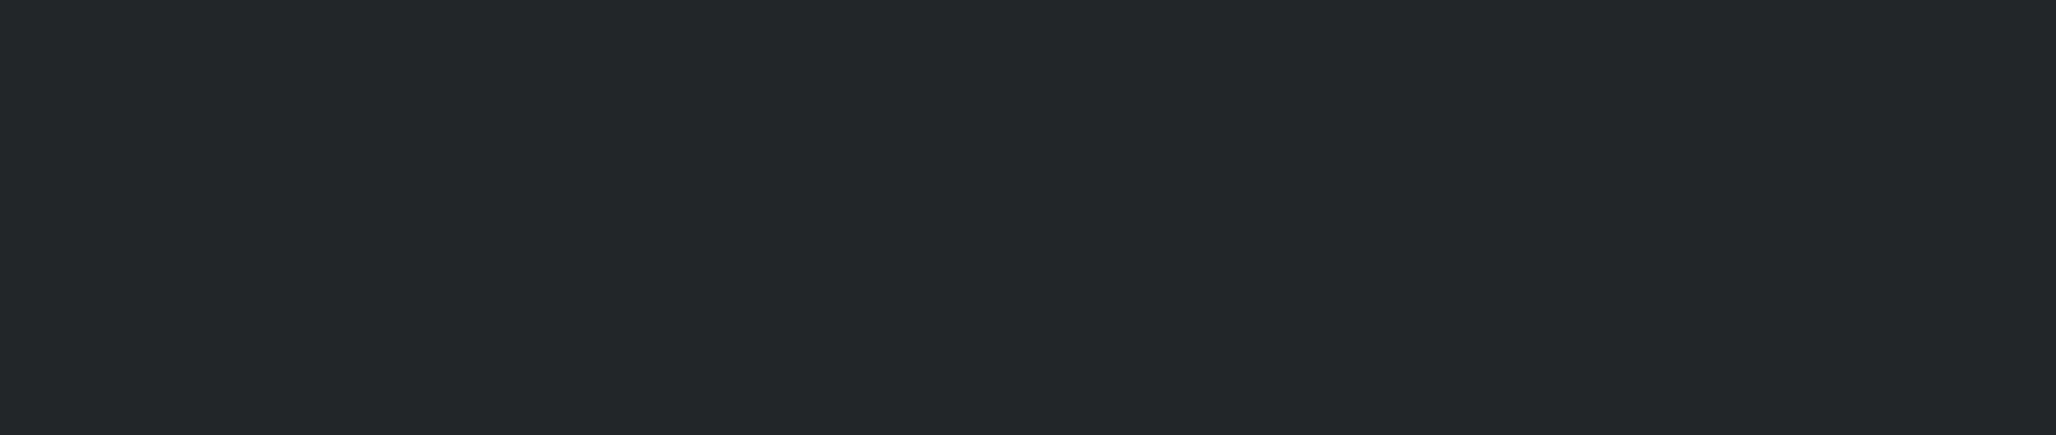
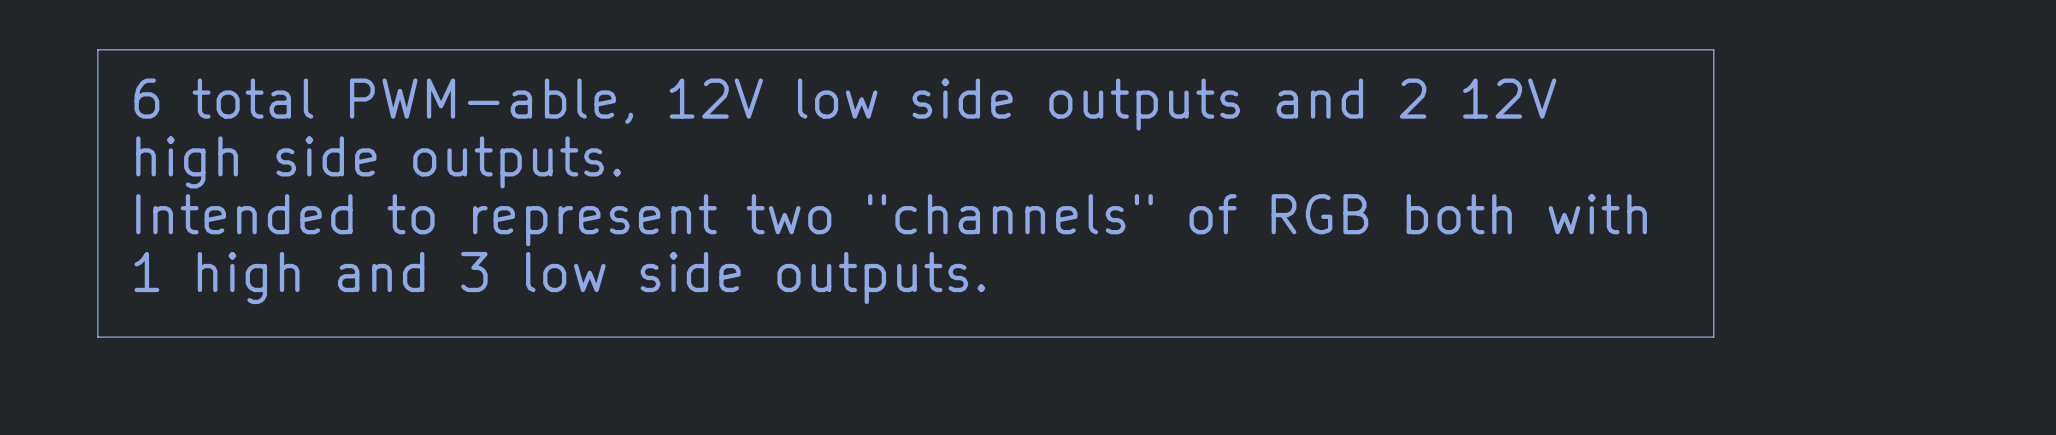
line: none -> (97, 49) (1713, 49) (1713, 337) (97, 337) (97, 49)
text: none -> 6 total PWM-able, 12V low side outputs and 2 12V (845, 104)
text: none -> high side outputs. (378, 162)
text: none -> Intended to represent two "channels" of RGB both with (891, 220)
text: none -> 1 high and 3 low side outputs. (559, 277)

